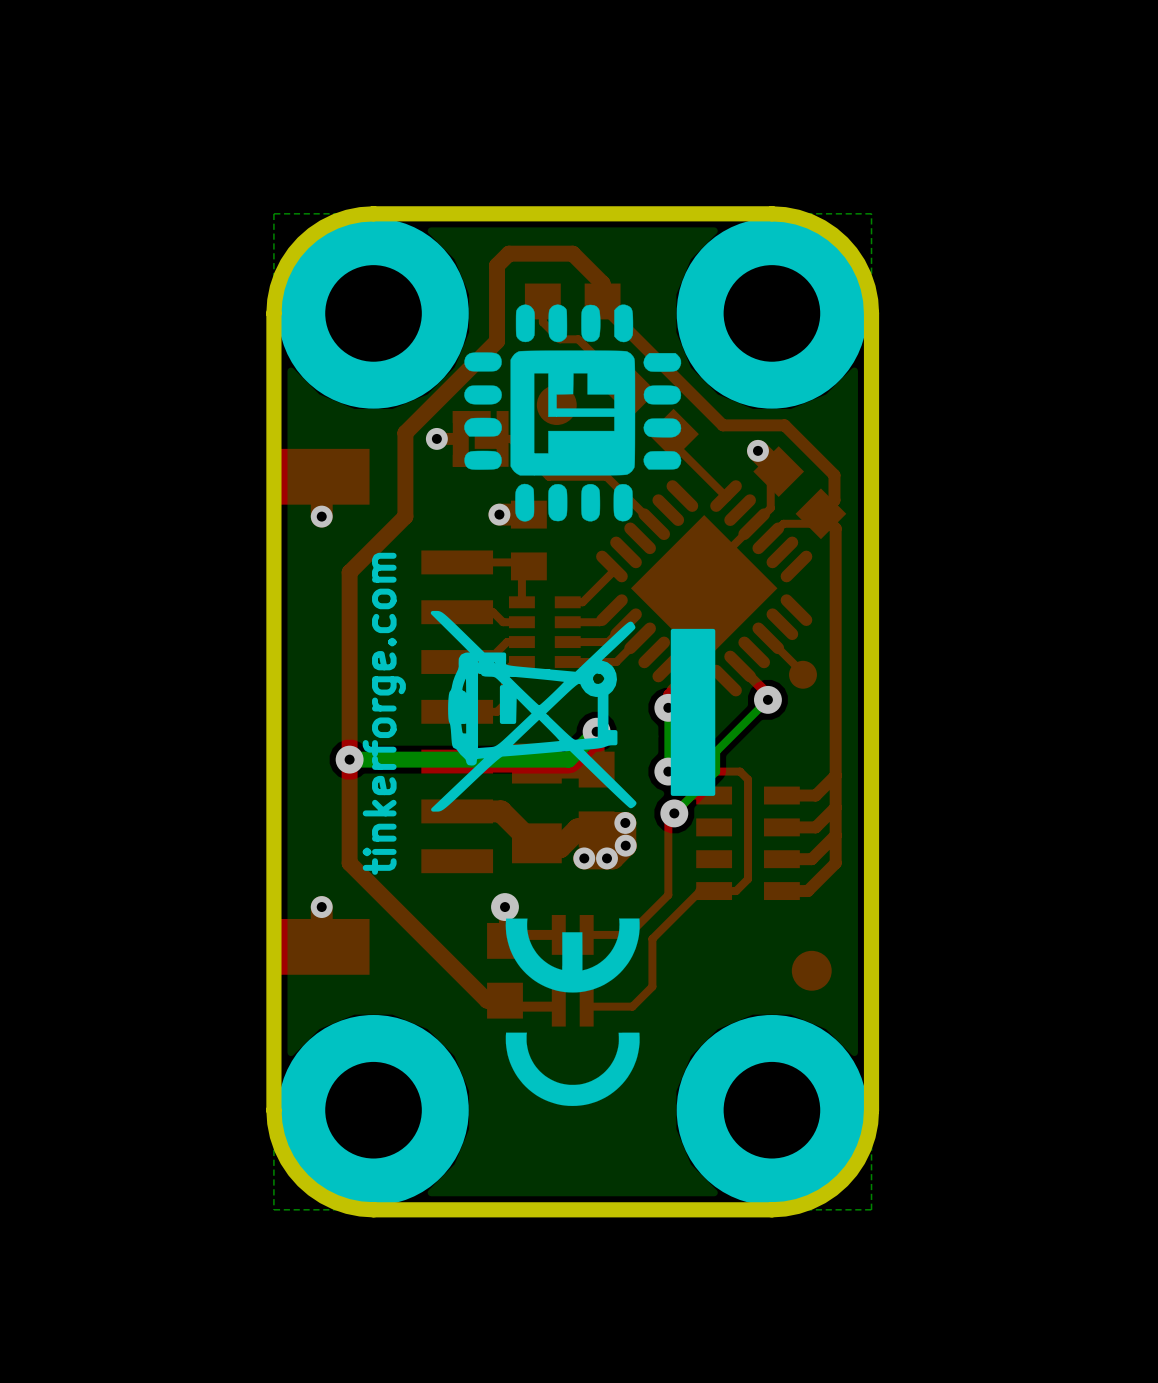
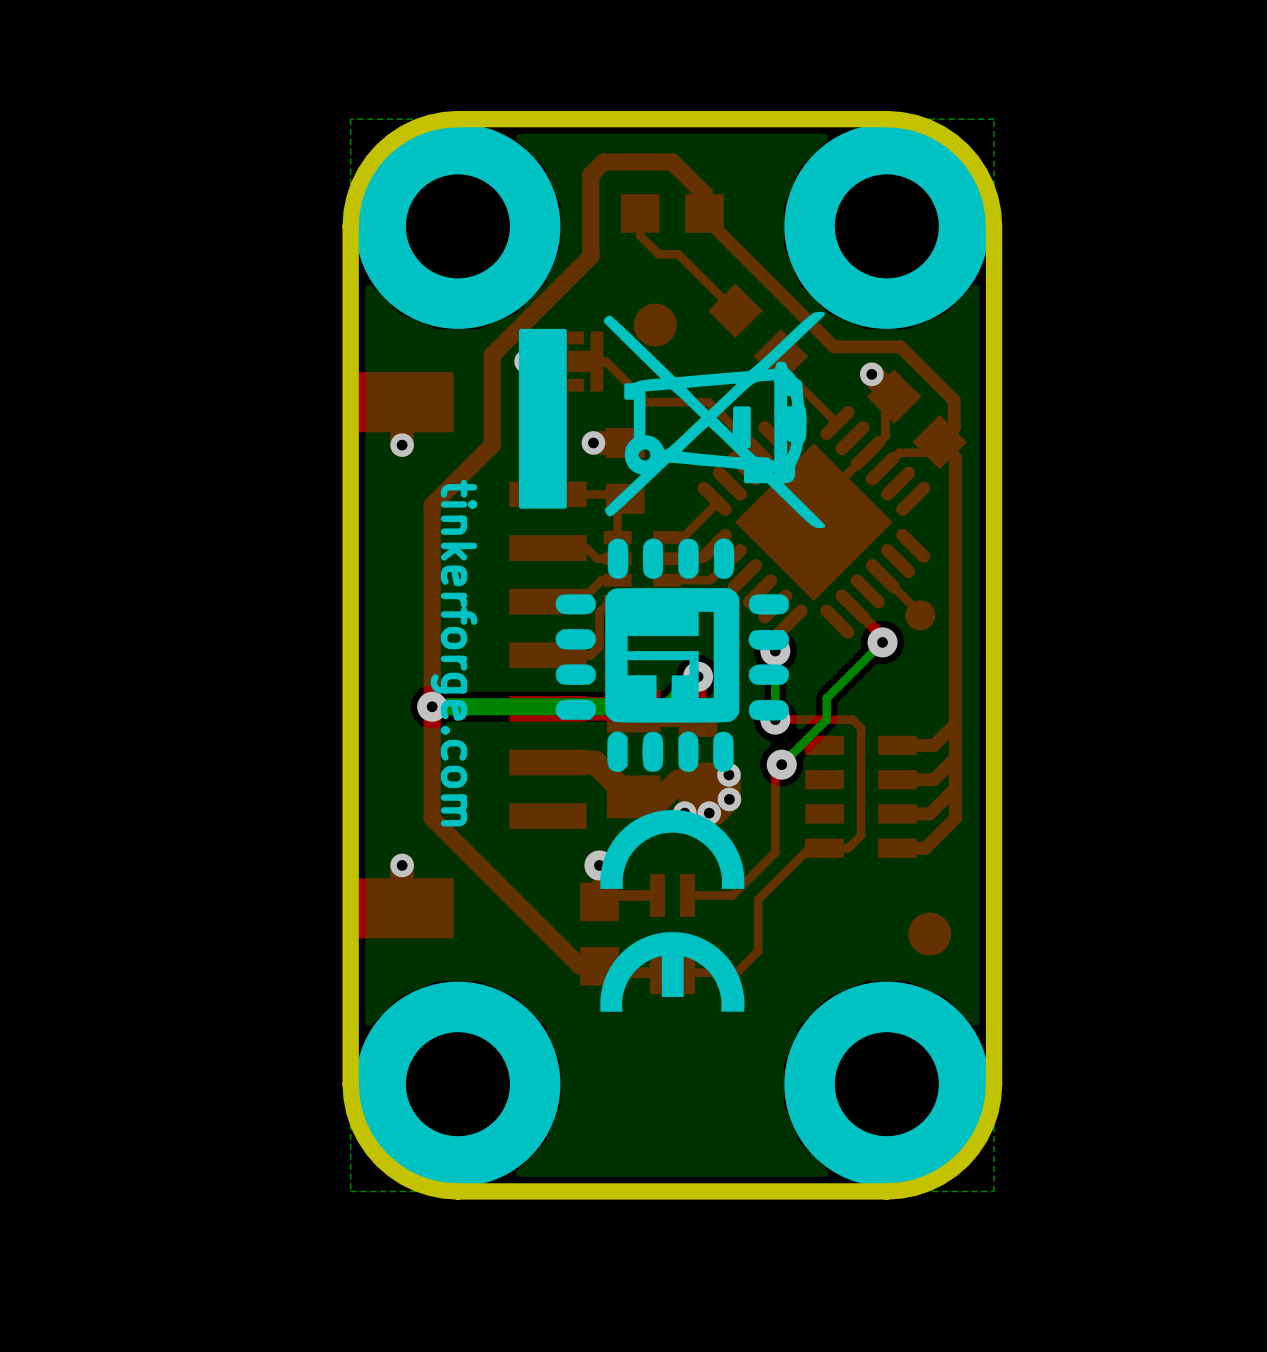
drawing: [464, 304, 682, 522] -> none
drawing: none -> [518, 311, 826, 529]
drawing shape: [430, 610, 716, 812] -> [555, 538, 790, 773]
text rotation: 0° (384, 713) -> 180° (454, 653)
drawing: none -> [600, 809, 745, 1012]
drawing: [505, 918, 640, 1106] -> none

